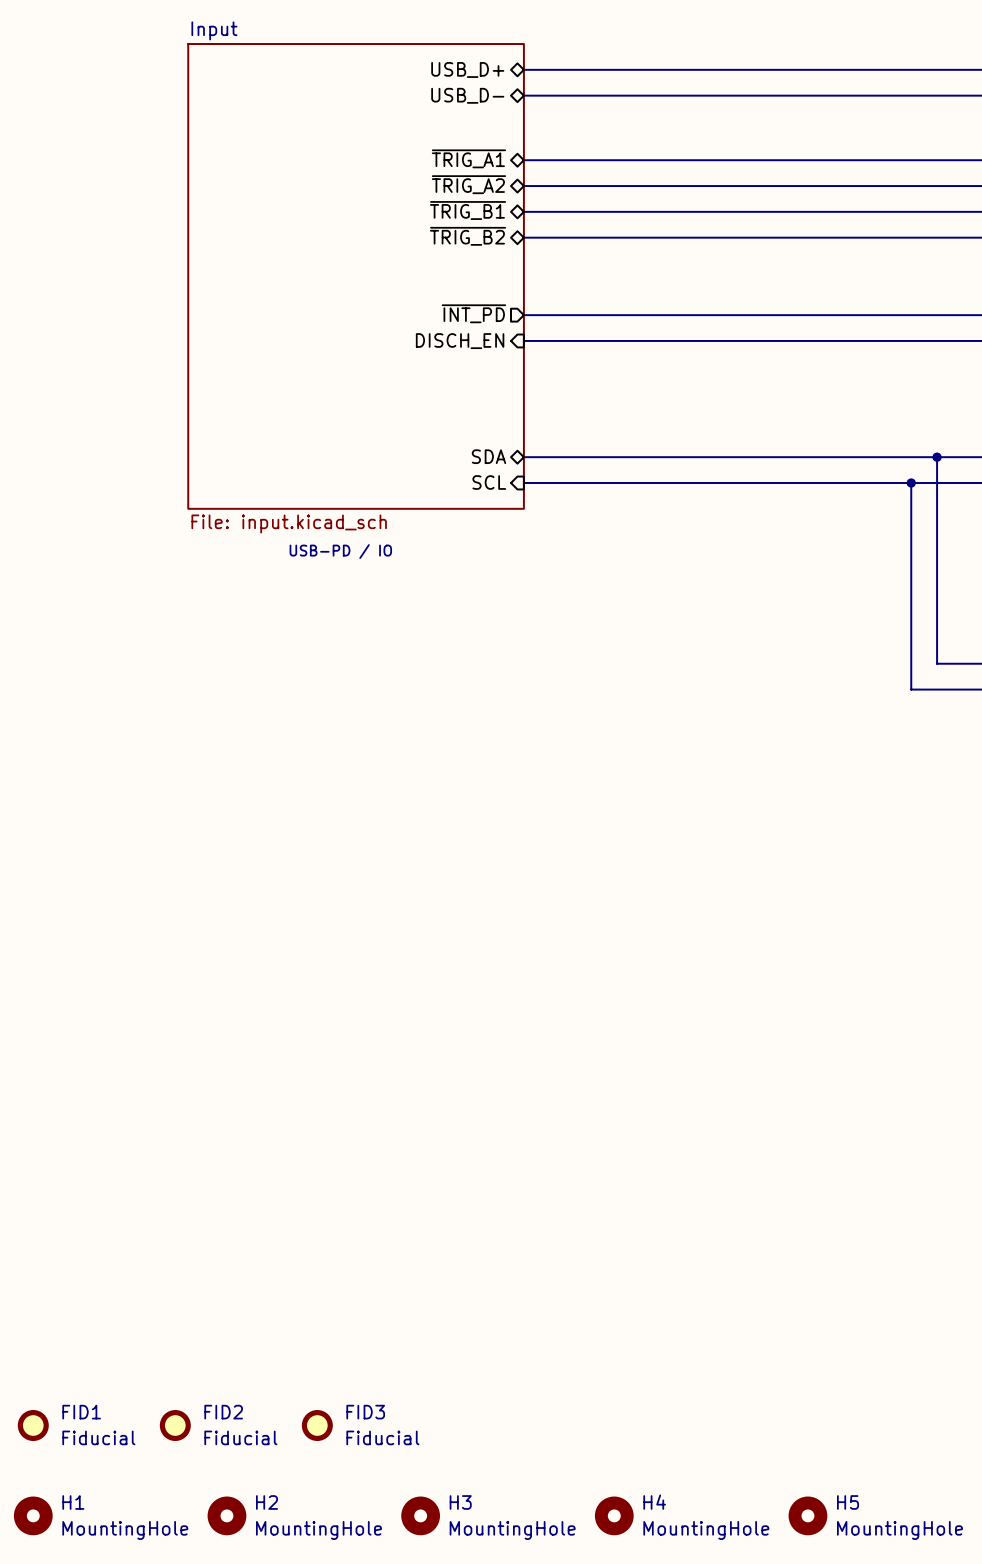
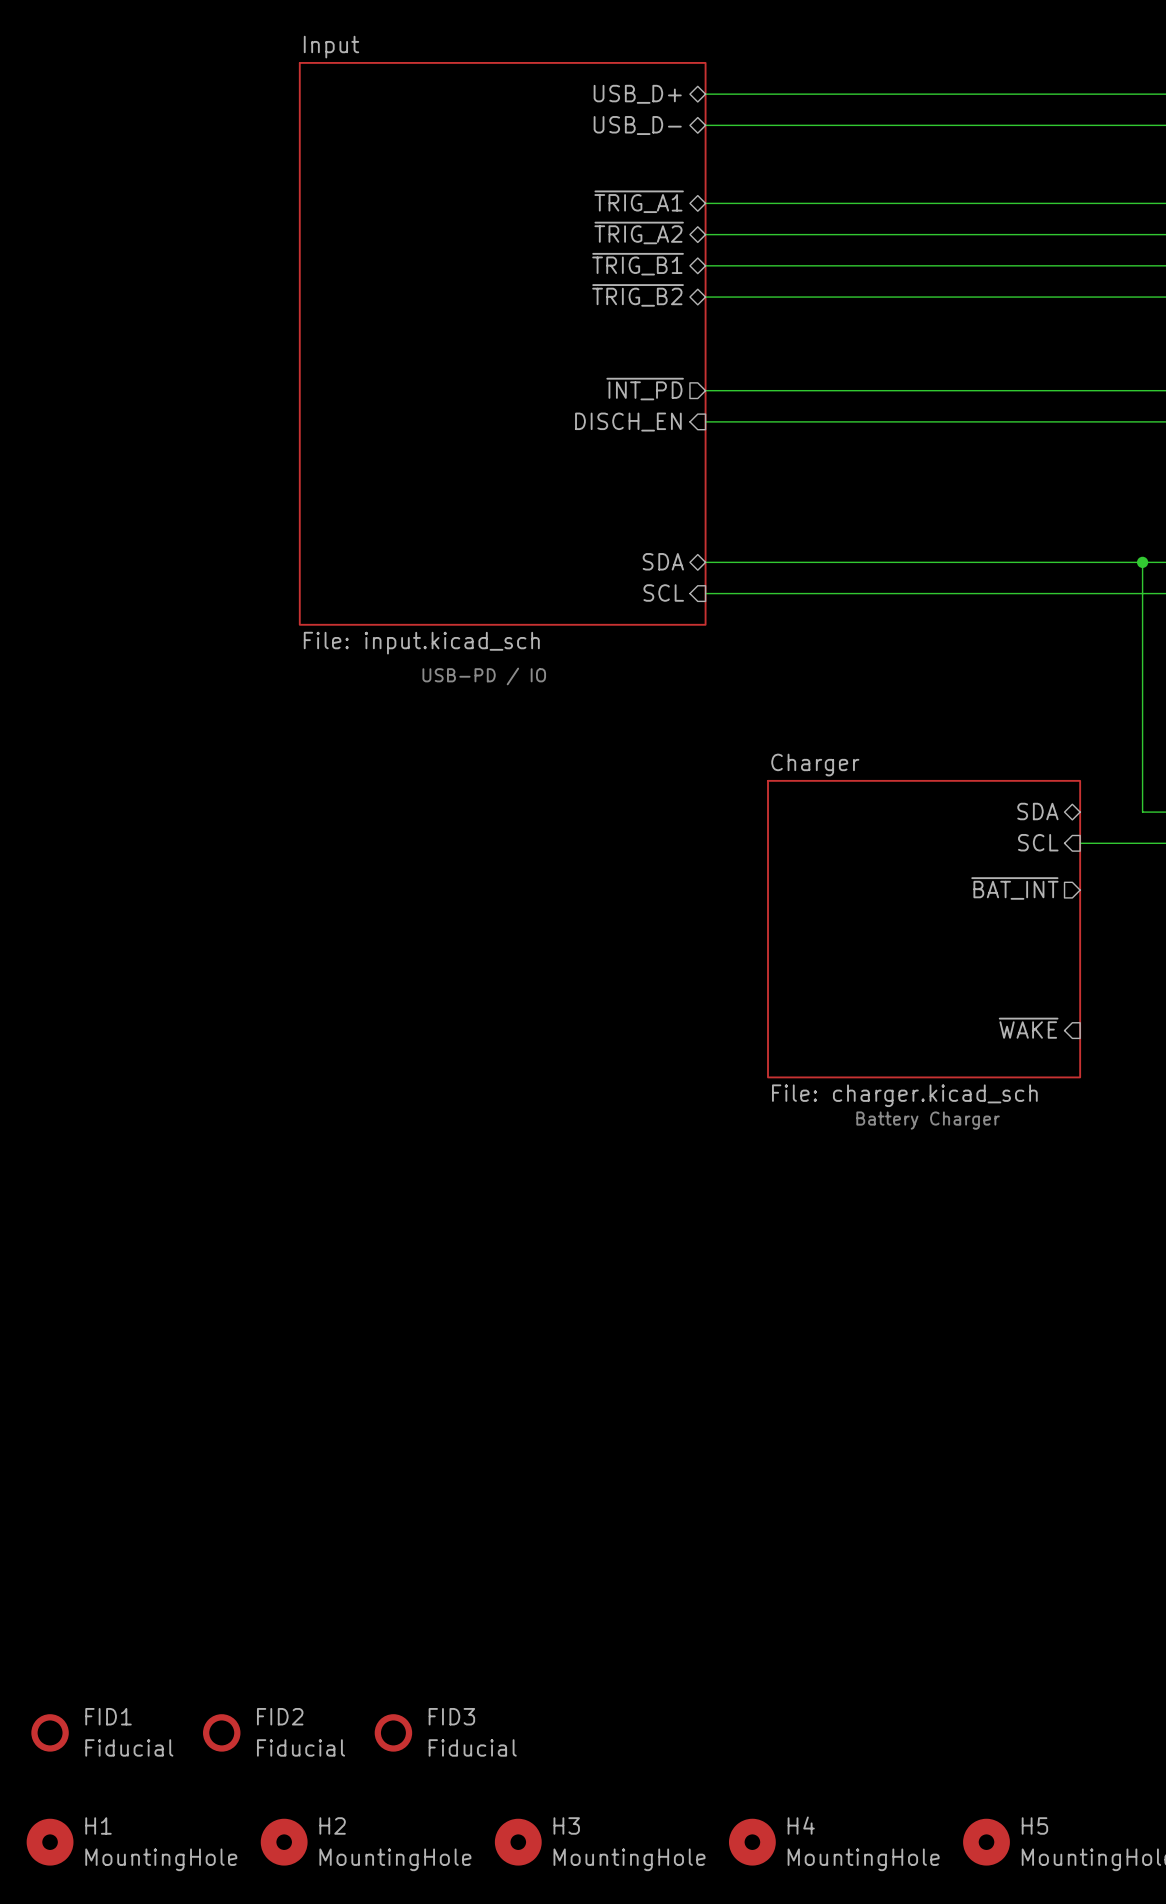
sheet pin position: USB_D+ (467, 69) -> USB_D+ (637, 94)
wire: (523, 69) (575, 69) -> none
sheet pin position: USB_D- (467, 95) -> USB_D- (637, 125)
wire: (523, 95) (575, 95) -> none
sheet pin position: ~{TRIG_A1} (468, 158) -> ~{TRIG_A1} (639, 201)
wire: (523, 160) (575, 160) -> none
sheet pin position: ~{TRIG_A2} (468, 184) -> ~{TRIG_A2} (639, 232)
wire: (523, 186) (575, 186) -> none
sheet pin position: ~{TRIG_B1} (468, 210) -> ~{TRIG_B1} (638, 264)
wire: (523, 211) (575, 211) -> none
sheet pin position: ~{TRIG_B2} (468, 236) -> ~{TRIG_B2} (638, 295)
wire: (523, 237) (575, 237) -> none
sheet Input position: (356, 276) -> (502, 343)
sheet pin position: ~{INT_PD} (473, 313) -> ~{INT_PD} (645, 389)
wire: (523, 315) (575, 315) -> none
wire: (523, 340) (575, 340) -> none
sheet pin position: DISCH_EN (460, 341) -> DISCH_EN (628, 422)
sheet pin position: SDA (488, 456) -> SDA (663, 561)
wire: (523, 457) (575, 457) -> none
sheet pin position: SCL (489, 482) -> SCL (663, 593)
wire: (523, 482) (575, 482) -> none
wire: (911, 482) (911, 689) -> (1080, 843) (1111, 843)
junction: (911, 482) -> none
text position: USB-PD / IO (340, 551) -> USB-PD / IO (484, 676)
sheet pin: none -> SDA (1037, 811)
sheet pin: none -> SCL (1038, 842)
sheet pin: none -> ~{BAT_INT} (1014, 888)
sheet Charger: none -> File: charger.kicad_sch (924, 929)
sheet pin: none -> ~{WAKE} (1028, 1028)
text: none -> Battery Charger (928, 1120)

